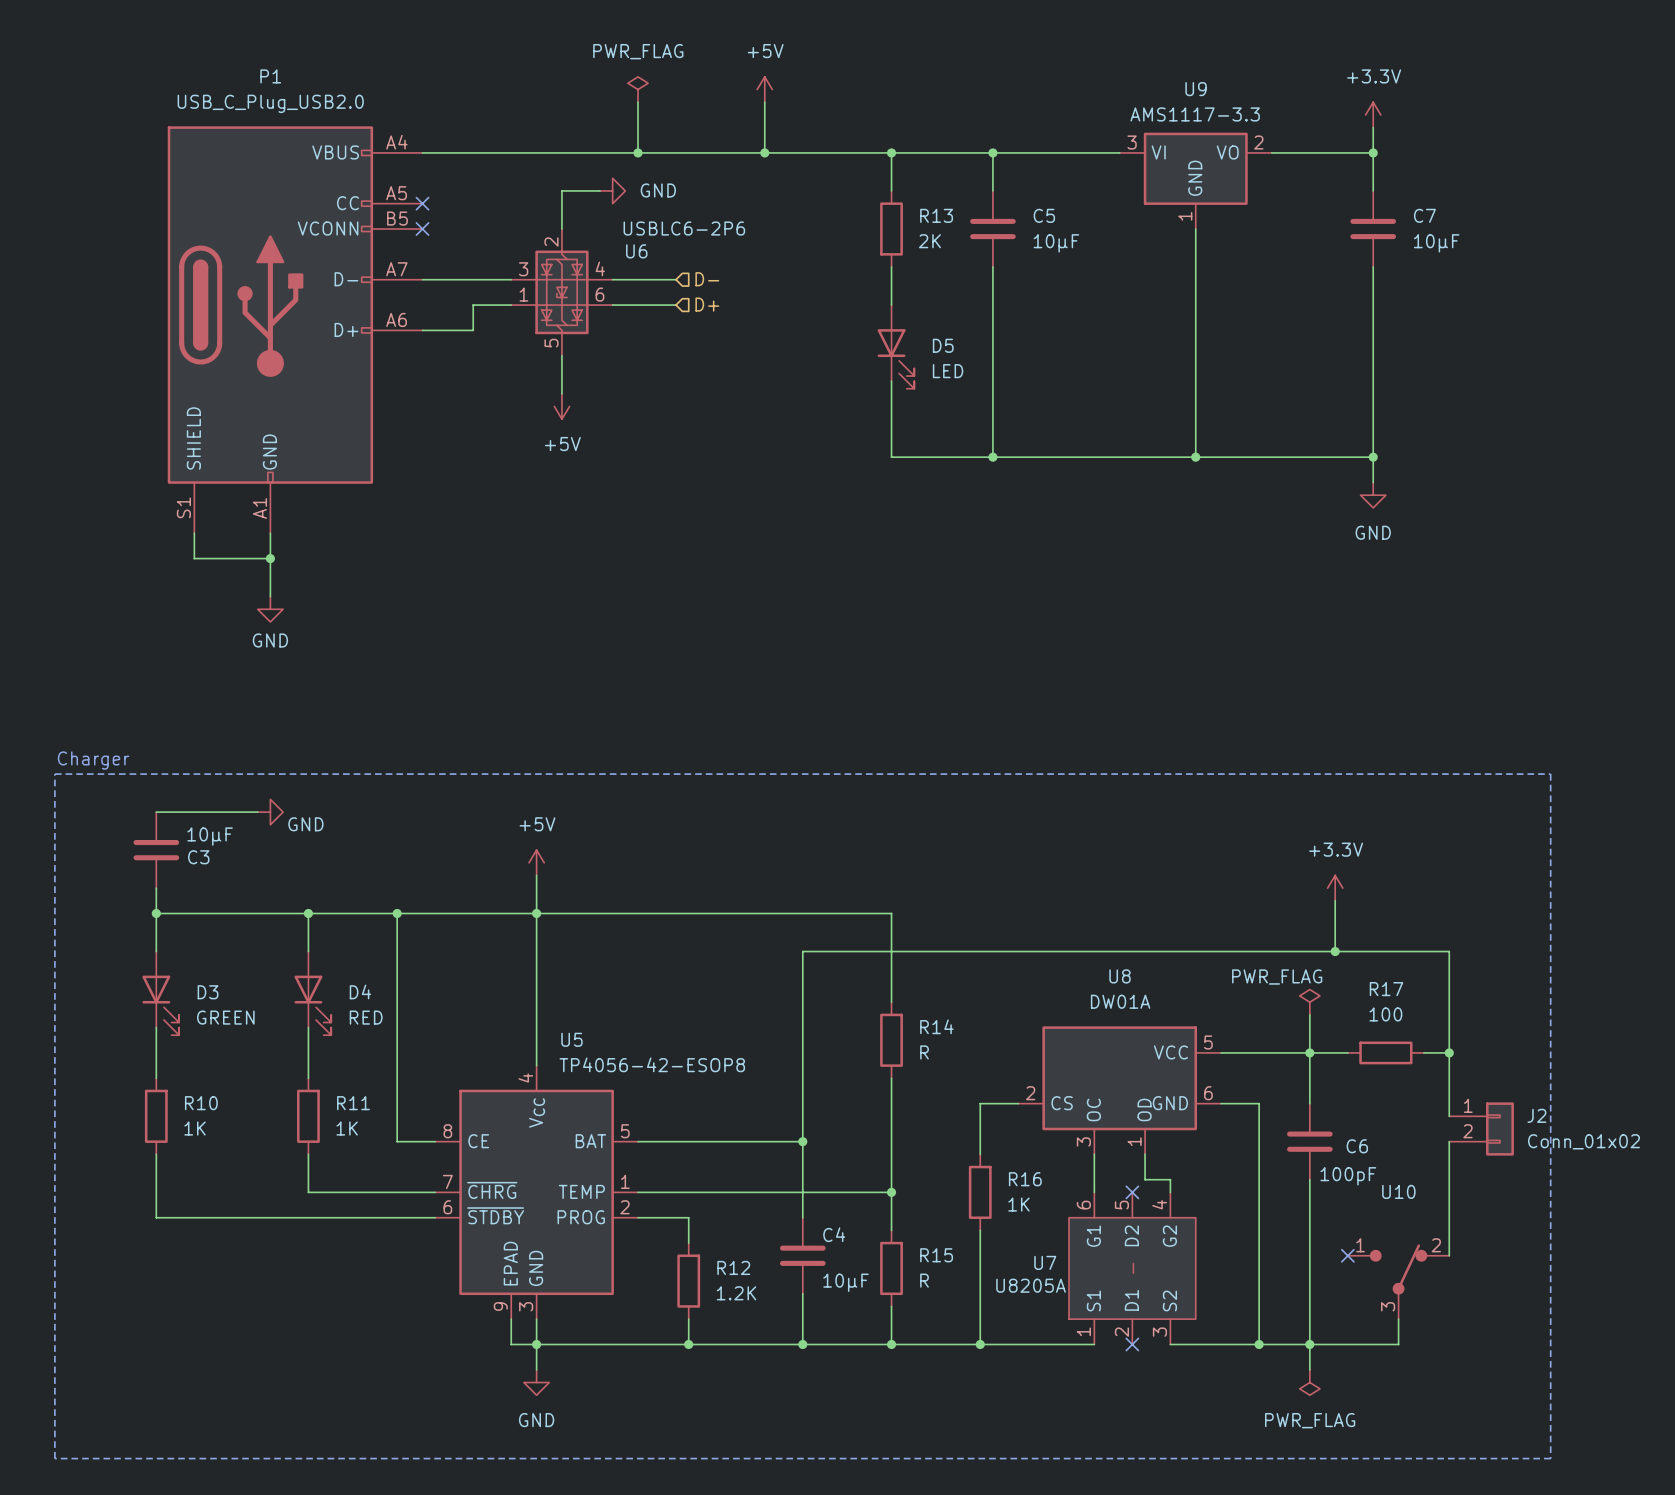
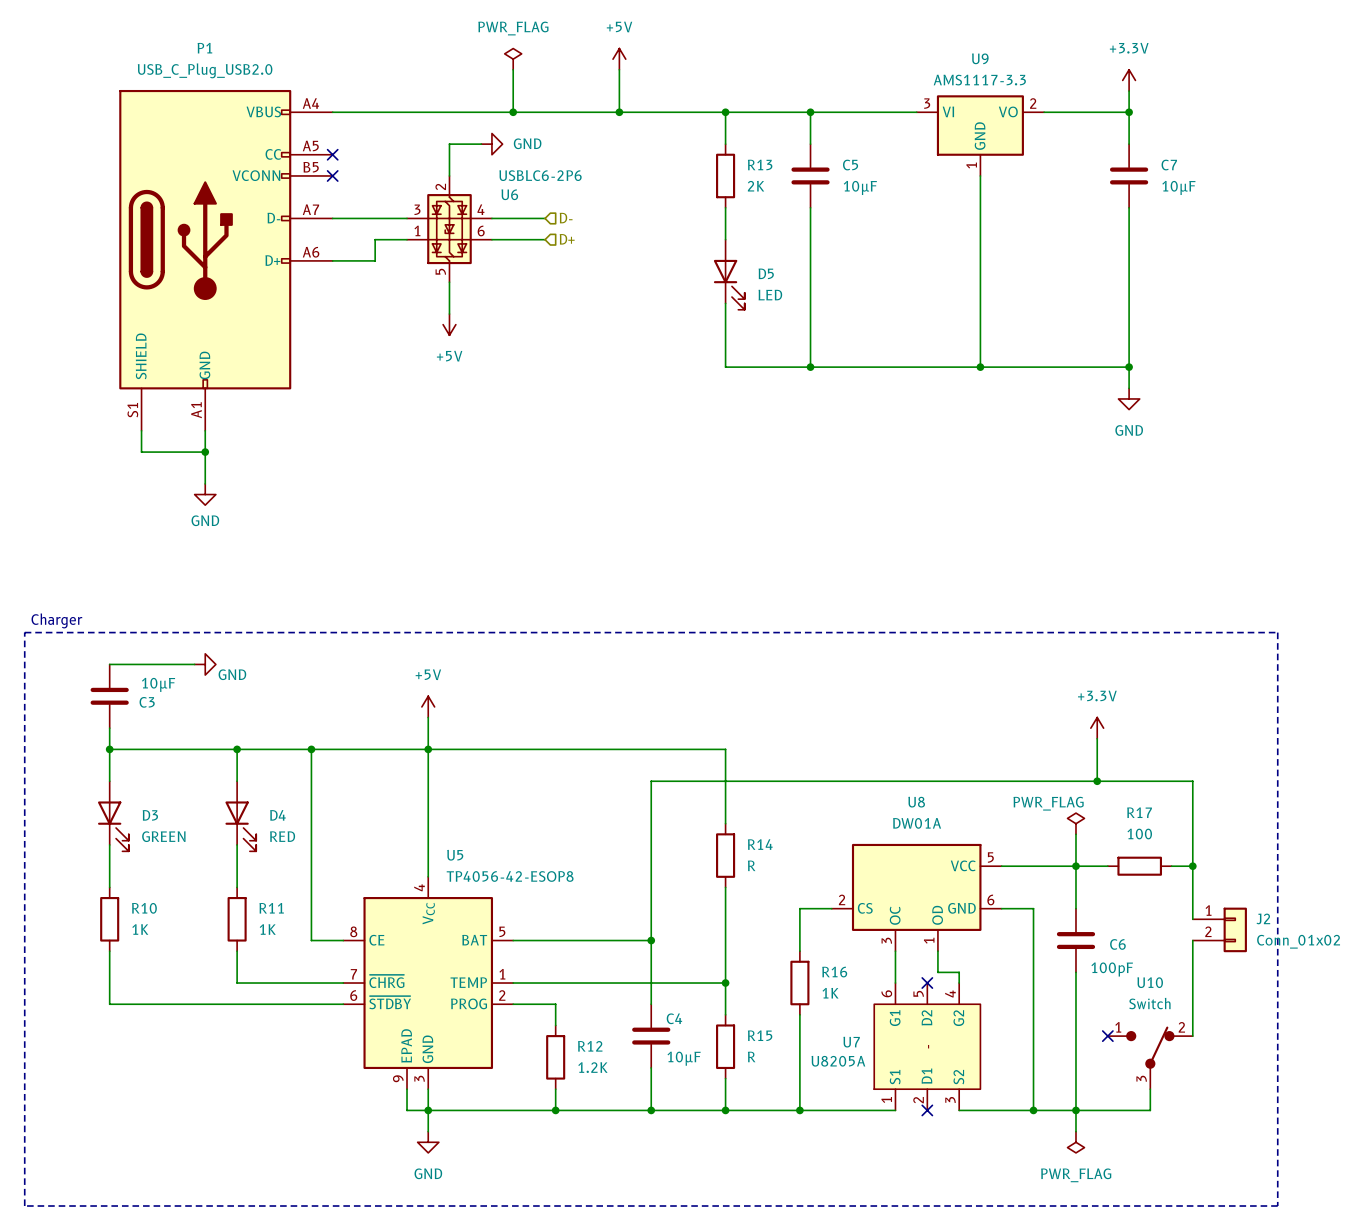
U10 value: none -> Switch (1149, 1003)

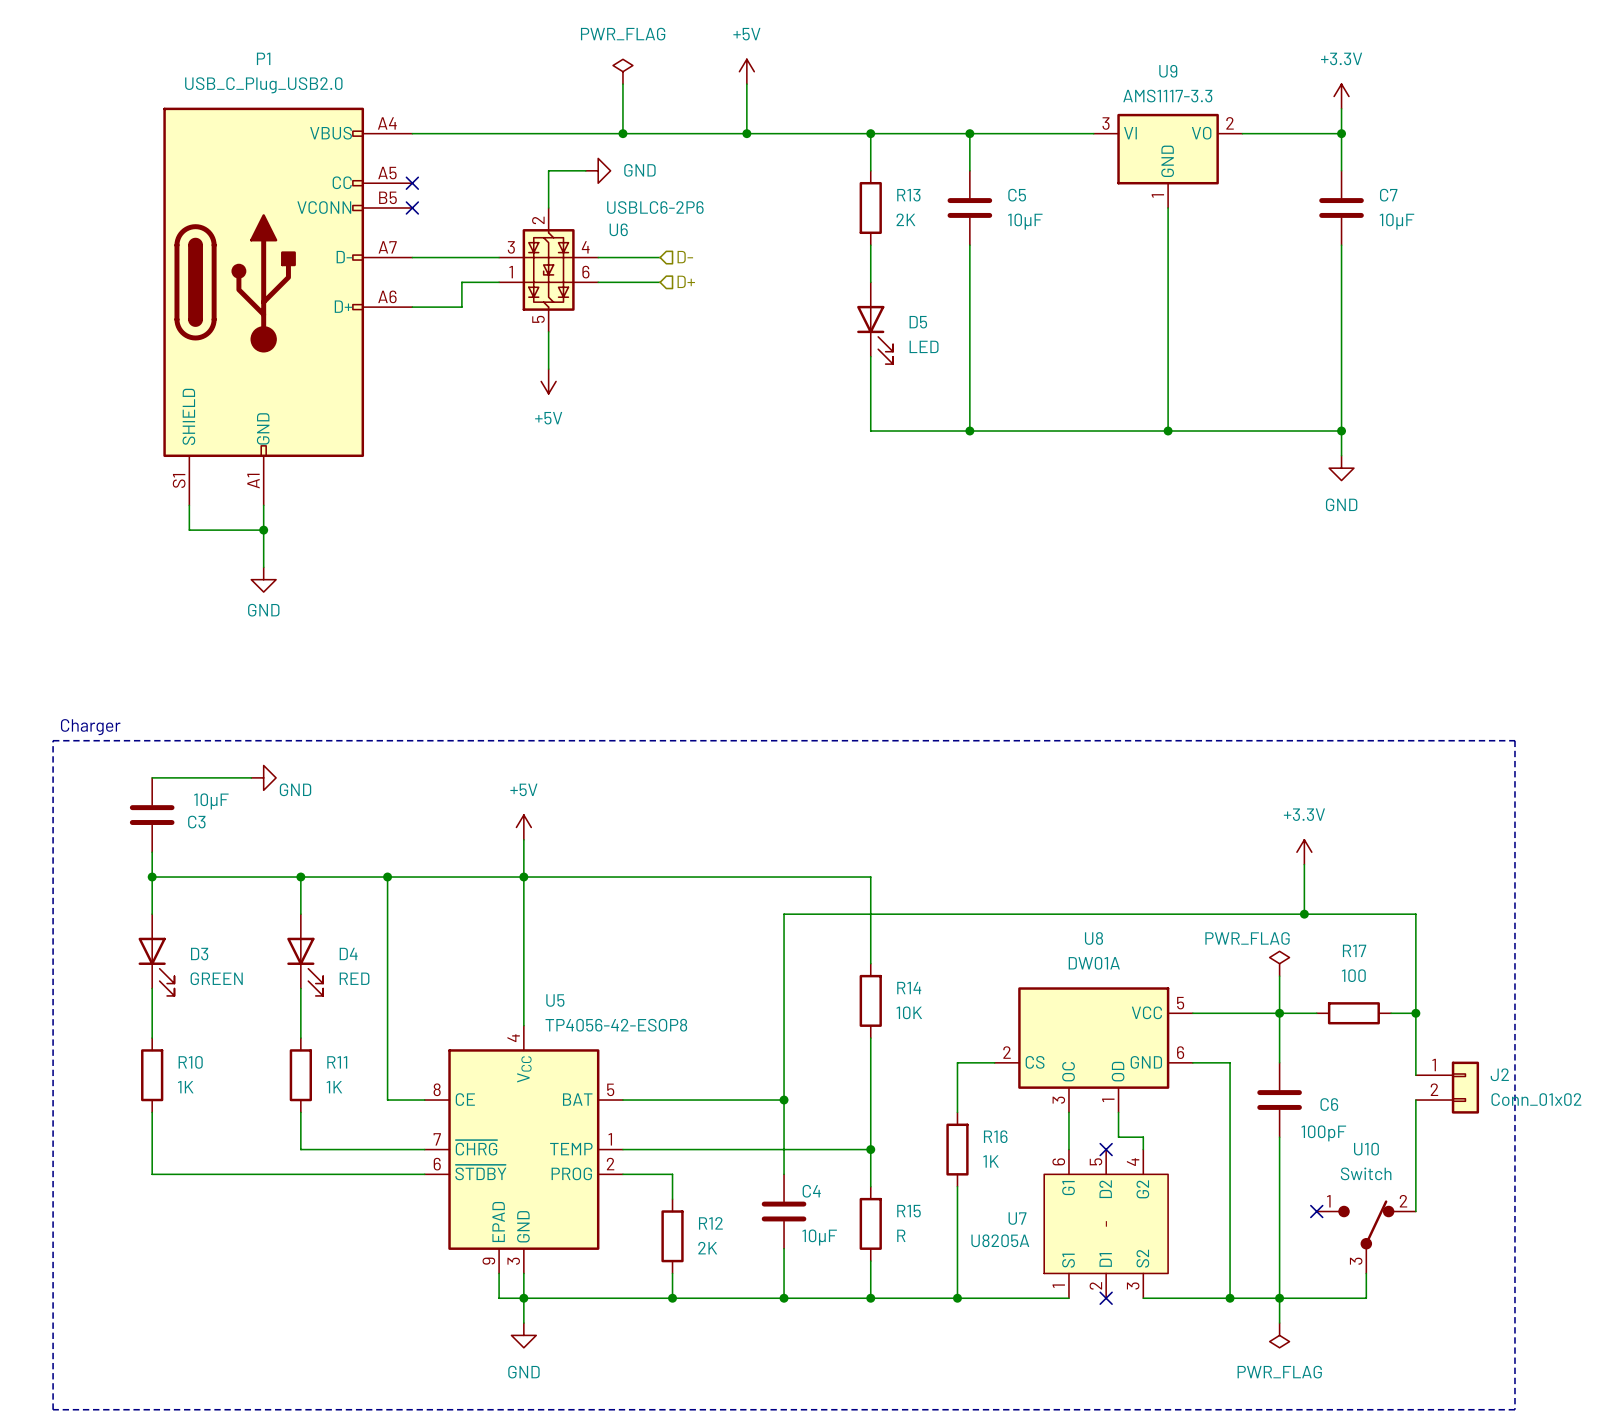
R14 value: R (751, 865) -> 10K (909, 1012)
R12 value: 1.2K (592, 1067) -> 2K (707, 1248)

